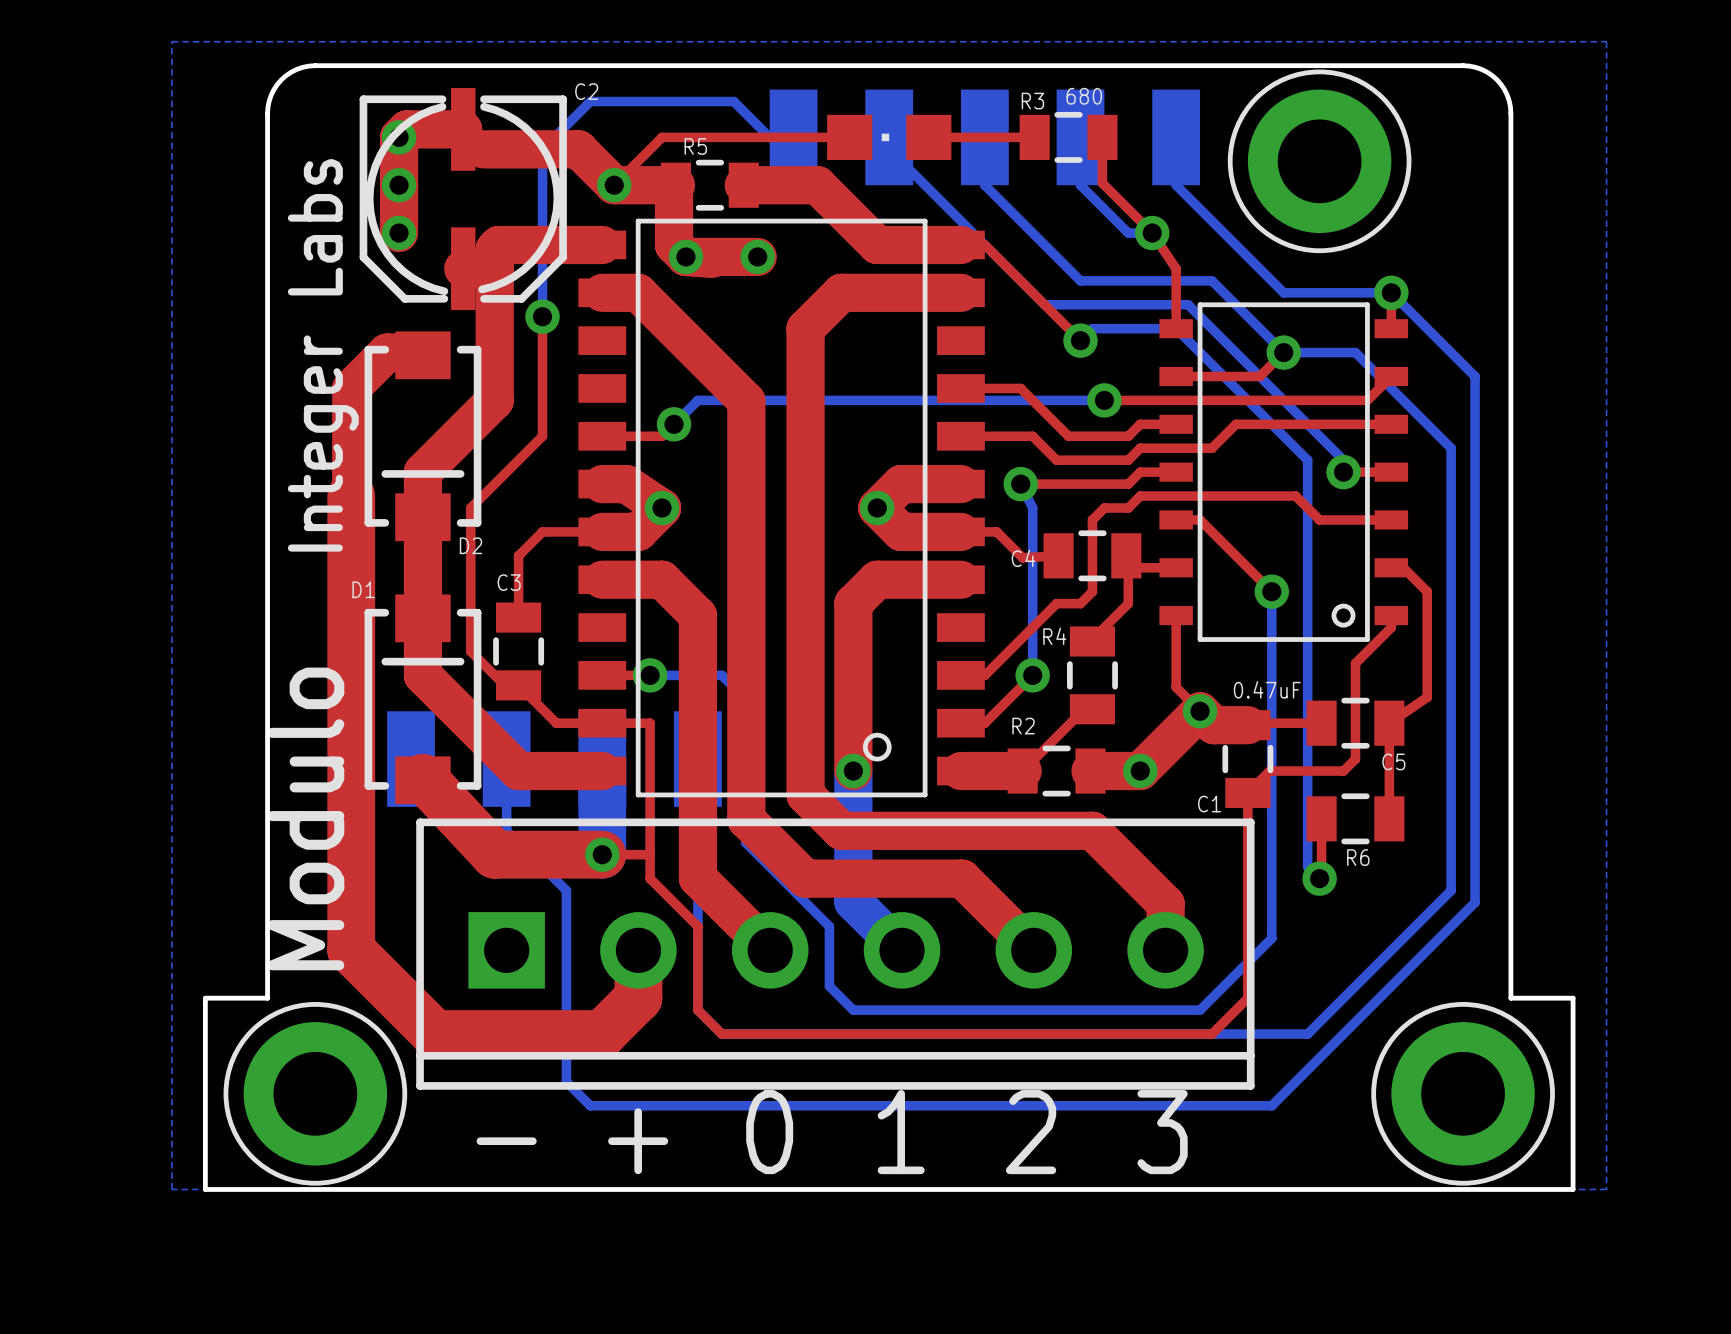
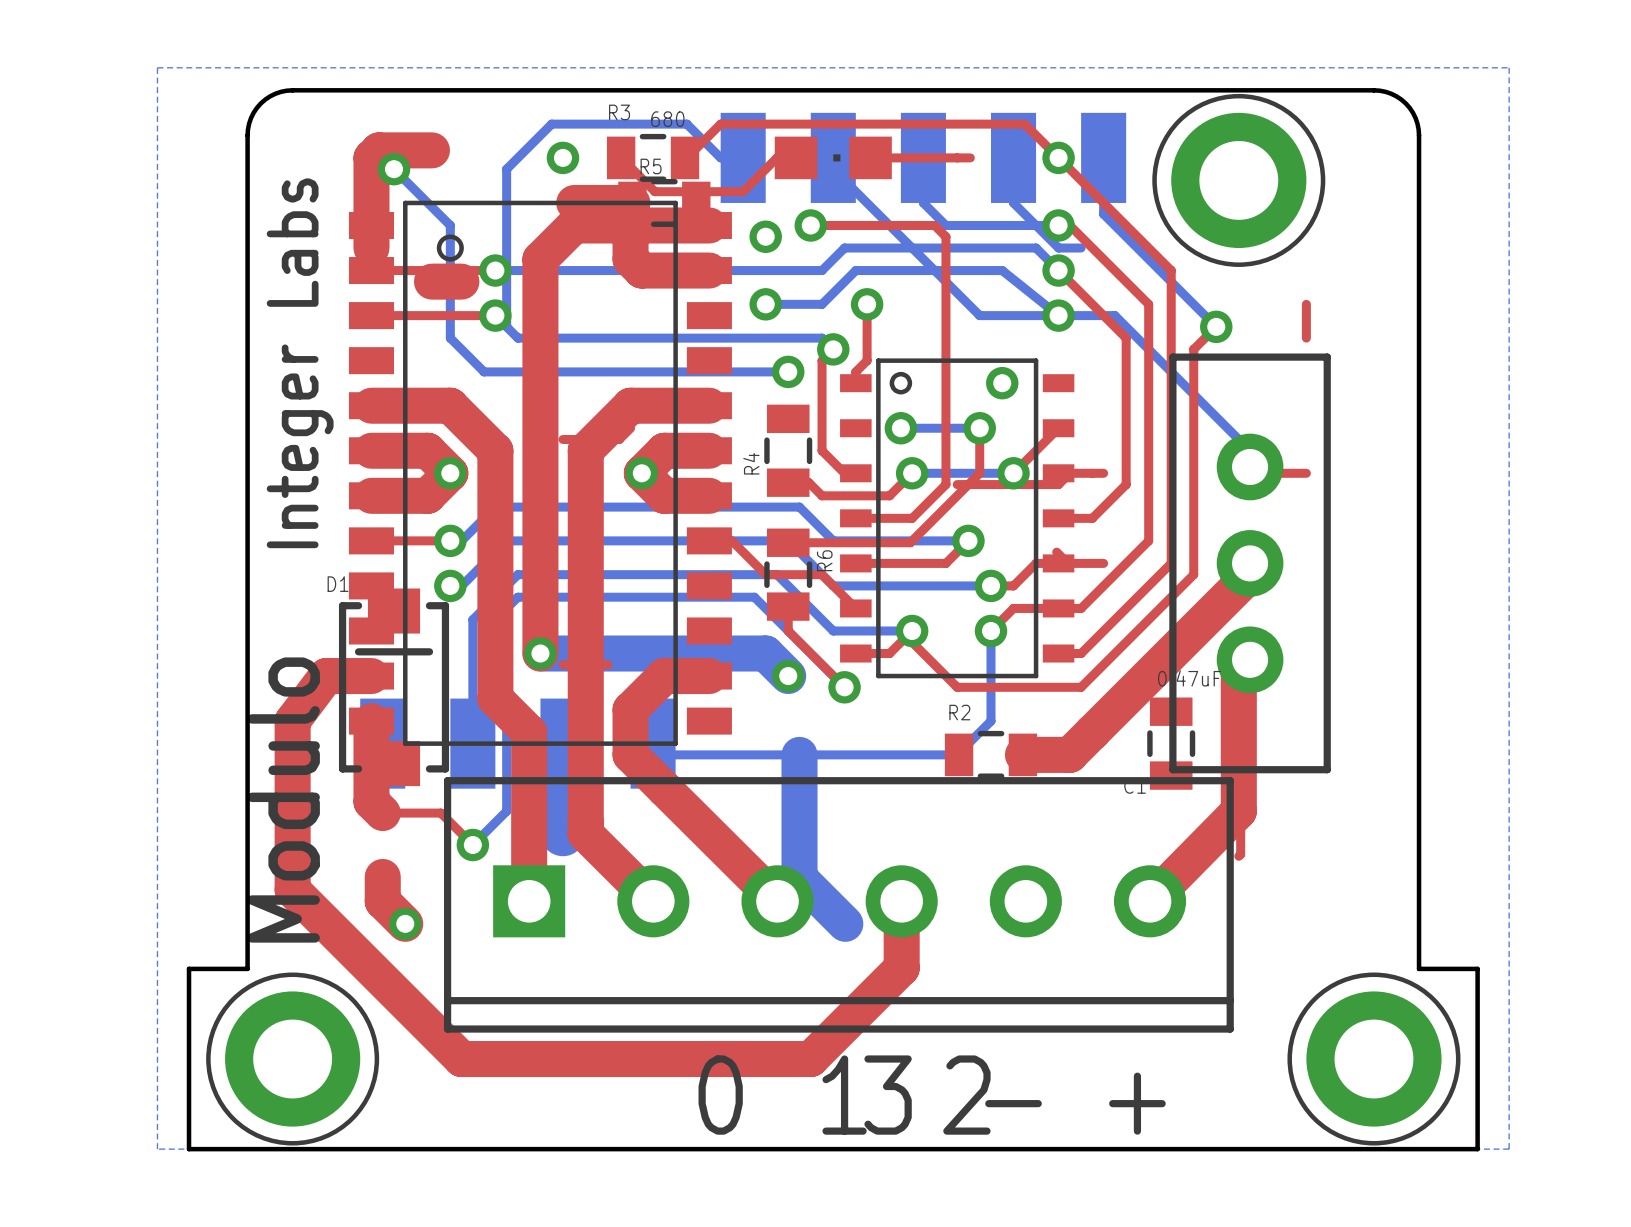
R3 name position: R3 (1032, 101) -> R3 (619, 112)
via position: (399, 137) -> (394, 169)
top track: (731, 137) (662, 137) (614, 185) (578, 149) (483, 149) -> none
top track: (733, 137) (829, 137) -> (621, 157) (654, 191) (743, 191) (776, 157)
top track: none -> (686, 157) (720, 124) (1024, 124) (1171, 270) (1171, 563) (1081, 653) (1058, 653)
part rotation: 0° (889, 137) -> 180° (833, 157)
R3 position: (1068, 137) -> (653, 157)
top track: (1102, 137) (1102, 183) (1152, 233) (1176, 268) (1176, 328) -> none
via: none -> (1058, 157)
bottom track: none -> (394, 169) (450, 225) (450, 338) (484, 371) (788, 371)
via: (399, 185) -> none
via position: (614, 185) -> (562, 157)
top track: (743, 185) (817, 185) (877, 244) (984, 244) (1080, 340) -> none
bottom track: (1176, 185) (1283, 292) (1391, 292) (1475, 376) (1475, 902) (1271, 1105) (590, 1105) (566, 1081) (566, 890) (506, 830) (506, 759) -> (912, 630) (833, 630) (776, 574) (517, 574) (472, 619) (472, 743)
bottom track: none -> (1103, 202) (1103, 214) (1216, 326)
C2: (463, 199) -> none
top track: none -> (709, 225) (574, 225) (540, 259) (540, 653)
top track: none -> (810, 225) (934, 225) (945, 236) (945, 484) (912, 518) (855, 518)
via: none -> (810, 225)
bottom track: (1008, 209) (1080, 280) (1212, 280) (1283, 352) (1355, 352) (1451, 448) (1451, 890) (1307, 1034) (721, 1034) (697, 1010) (697, 747) -> (945, 225) (1058, 225)
top track: none -> (1058, 225) (1069, 225) (1148, 304) (1148, 540) (1081, 608) (1013, 608) (991, 630)
via: none -> (1058, 225)
via: none -> (765, 236)
via: (399, 233) -> none
via: (1152, 233) -> none
top track: (602, 244) (498, 244) (494, 249) (494, 400) (422, 472) (422, 675) (518, 771) (602, 771) -> none
top track: none -> (371, 270) (495, 270)
bottom track: none -> (495, 270) (822, 270) (844, 248) (1036, 248) (1058, 270)
via: none -> (495, 270)
via: (685, 256) -> none
via: (757, 256) -> none
top track: none -> (1058, 270) (1126, 338) (1126, 484) (1092, 518) (1058, 518)
via: none -> (1058, 270)
top track: (602, 292) (638, 292) (746, 400) (746, 819) (805, 878) (962, 878) (1033, 950) -> none
bottom track: none -> (765, 304) (822, 304) (855, 270) (1002, 270) (1058, 315)
via: none -> (765, 304)
top track: none -> (867, 304) (867, 360) (855, 371) (855, 383)
via: none -> (867, 304)
top track: (960, 292) (841, 292) (805, 328) (805, 794) (841, 830) (1092, 830) (1165, 903) (1165, 950) -> none
via: (1391, 292) -> none
top track: none -> (371, 315) (495, 315)
bottom track: none -> (495, 315) (517, 338) (822, 338) (833, 349)
via: none -> (1058, 315)
top track: (542, 316) (542, 436) (470, 508) (470, 651) (504, 685) (518, 685) (556, 723) (650, 723) (650, 878) (697, 926) (697, 1010) (721, 1034) (1212, 1034) (1247, 998) (1247, 792) (1269, 771) (1343, 771) (1355, 759) (1355, 663) (1391, 627) (1391, 615) -> none
via position: (542, 316) -> (495, 315)
top track: none -> (1216, 326) (1193, 349) (1193, 574) (1081, 687) (957, 687) (912, 642) (912, 630) (889, 653) (855, 653)
top track: none -> (833, 349) (822, 360) (822, 450) (844, 473) (855, 473)
via: none -> (833, 349)
bottom track: (1080, 340) (1092, 328) (1176, 328) (1307, 460) (1307, 866) (1319, 878) -> none
via: (1080, 340) -> none
top track: (1283, 352) (1259, 376) (1176, 376) -> none
via position: (1283, 352) -> (1216, 326)
top track: (422, 355) (420, 352) (387, 352) (351, 388) (351, 950) -> (371, 676) (326, 676) (292, 721) (292, 890) (326, 923)
via: none -> (788, 371)
via: none -> (1002, 383)
top track: (1391, 376) (1367, 400) (1104, 400) -> none
top track: (960, 388) (1020, 388) (1068, 436) (1128, 436) (1140, 424) (1176, 424) -> none
top track: none -> (371, 405) (450, 405) (495, 450) (495, 698) (529, 732) (529, 901)
top track: none -> (709, 405) (630, 405) (585, 450) (585, 833) (653, 901)
bottom track: (1104, 400) (697, 400) (674, 424) -> none
via: (1104, 400) -> none
via: (674, 424) -> none
bottom track: none -> (900, 428) (979, 428)
via: none -> (900, 428)
top track: none -> (979, 428) (979, 473) (910, 542) (788, 542)
via: none -> (979, 428)
top track: none -> (1058, 428) (1013, 473)
top track: (1391, 424) (1235, 424) (1212, 448) (1140, 448) (1128, 460) (1056, 460) (1032, 436) (960, 436) -> none
D2: (422, 436) -> none
top track: none -> (371, 450) (427, 450) (450, 473) (427, 495) (371, 495)
top track: none -> (709, 450) (664, 450) (641, 473) (664, 495) (709, 495)
via: none -> (450, 473)
via: none -> (641, 473)
bottom track: none -> (912, 473) (1013, 473)
top track: none -> (912, 473) (889, 495) (822, 495) (808, 482) (788, 482)
via: none -> (912, 473)
via: none -> (1013, 473)
part rotation: 0° (1283, 472) -> 180° (957, 518)
part position: (1283, 472) -> (957, 518)
via: (1343, 472) -> none
top track: (602, 484) (626, 484) (662, 508) (638, 531) (542, 531) (518, 555) (518, 617) -> none
top track: (972, 484) (901, 484) (877, 508) (901, 531) (996, 531) (1022, 557) (1058, 555) -> none
bottom track: (1020, 484) (1032, 508) (1032, 675) -> none
via: (1020, 484) -> none
via: (662, 508) -> none
part rotation: 0° (781, 508) -> 180° (540, 473)
via: (877, 508) -> none
top track: (1176, 519) (1200, 519) (1271, 591) -> none
top track: (1391, 519) (1319, 519) (1295, 496) (1140, 496) (1128, 508) (1104, 508) (1092, 519) (1092, 591) (1080, 603) (1056, 603) (984, 675) (960, 675) -> none
top track: none -> (371, 540) (450, 540)
bottom track: none -> (450, 540) (461, 540) (495, 507) (799, 507) (833, 540) (968, 540)
via: none -> (450, 540)
top track: none -> (709, 540) (731, 540) (765, 574) (822, 574) (855, 608)
top track: none -> (968, 540) (945, 563) (855, 563)
via: none -> (968, 540)
C4: (1092, 555) -> none
top track: (1128, 557) (1128, 603) (1092, 641) -> none
top track: none -> (1058, 563) (1036, 563) (1013, 585) (991, 585)
top track: none -> (1250, 563) (1250, 574) (1126, 698)
part: none -> (1250, 563)
top track: (1391, 567) (1403, 567) (1427, 591) (1427, 697) (1389, 723) (1389, 818) -> none
top track: (602, 579) (662, 579) (697, 615) (697, 878) (770, 950) -> none
top track: (960, 579) (877, 579) (853, 603) (853, 771) -> none
bottom track: none -> (450, 585) (461, 585) (506, 540) (788, 540) (833, 585) (991, 585)
via: none -> (450, 585)
via: none -> (991, 585)
bottom track: (1271, 591) (1271, 938) (1200, 1010) (853, 1010) (829, 986) (829, 926) (745, 842) (745, 699) (721, 675) (650, 675) -> none
via: (1271, 591) -> none
top track: none -> (788, 606) (788, 630) (844, 687)
top track: (1176, 615) (1176, 687) (1214, 725) (1321, 723) -> none
R4 name rotation: 0° (1054, 636) -> 90° counterclockwise (751, 463)
R4 name position: R4 (1054, 636) -> R4 (751, 463)
via: none -> (912, 630)
bottom track: none -> (991, 630) (991, 721) (957, 754) (664, 754) (653, 743)
via: none -> (991, 630)
C3: (518, 651) -> none
bottom track: none -> (540, 653) (765, 653) (788, 676)
top track: none -> (1250, 659) (1238, 671) (1238, 811) (1150, 901)
via position: (650, 675) -> (540, 653)
top track: (1032, 675) (984, 723) (960, 723) -> none
via: (1032, 675) -> none
R4 position: (1092, 675) -> (788, 450)
top track: none -> (709, 676) (664, 676) (630, 709) (630, 754) (777, 901)
via: none -> (788, 676)
bottom track: none -> (844, 687) (754, 597) (517, 597) (506, 608) (506, 811) (472, 845)
via: none -> (844, 687)
top track: (1092, 709) (1092, 711) (1082, 713) (1082, 711) (1022, 771) (960, 771) -> none
via: (1200, 711) -> none
C5: (1355, 723) -> none
top track: none -> (371, 721) (371, 801) (382, 813) (440, 813) (472, 845)
via: (853, 771) -> none
via: (1140, 771) -> none
top track: (422, 780) (425, 777) (422, 777) (494, 854) (650, 854) -> none
R6 rotation: 0° (1355, 818) -> 90° clockwise (788, 574)
R6 position: (1355, 818) -> (788, 574)
via: (602, 854) -> none
via: none -> (472, 845)
via: (1319, 878) -> none
top track: none -> (382, 876) (382, 901) (405, 923)
top track width: thick (351, 950) (434, 1034) -> thin (326, 923) (405, 1002)
via: none -> (405, 923)
top track: (638, 950) (638, 997) (602, 1034) (434, 1034) -> (901, 901) (901, 968) (810, 1059) (461, 1059) (405, 1002)
part position: (835, 954) -> (838, 904)
text position: 3 (1162, 1132) -> 3 (888, 1095)
text position: - (506, 1141) -> - (1013, 1103)
text position: + (638, 1141) -> + (1137, 1103)

